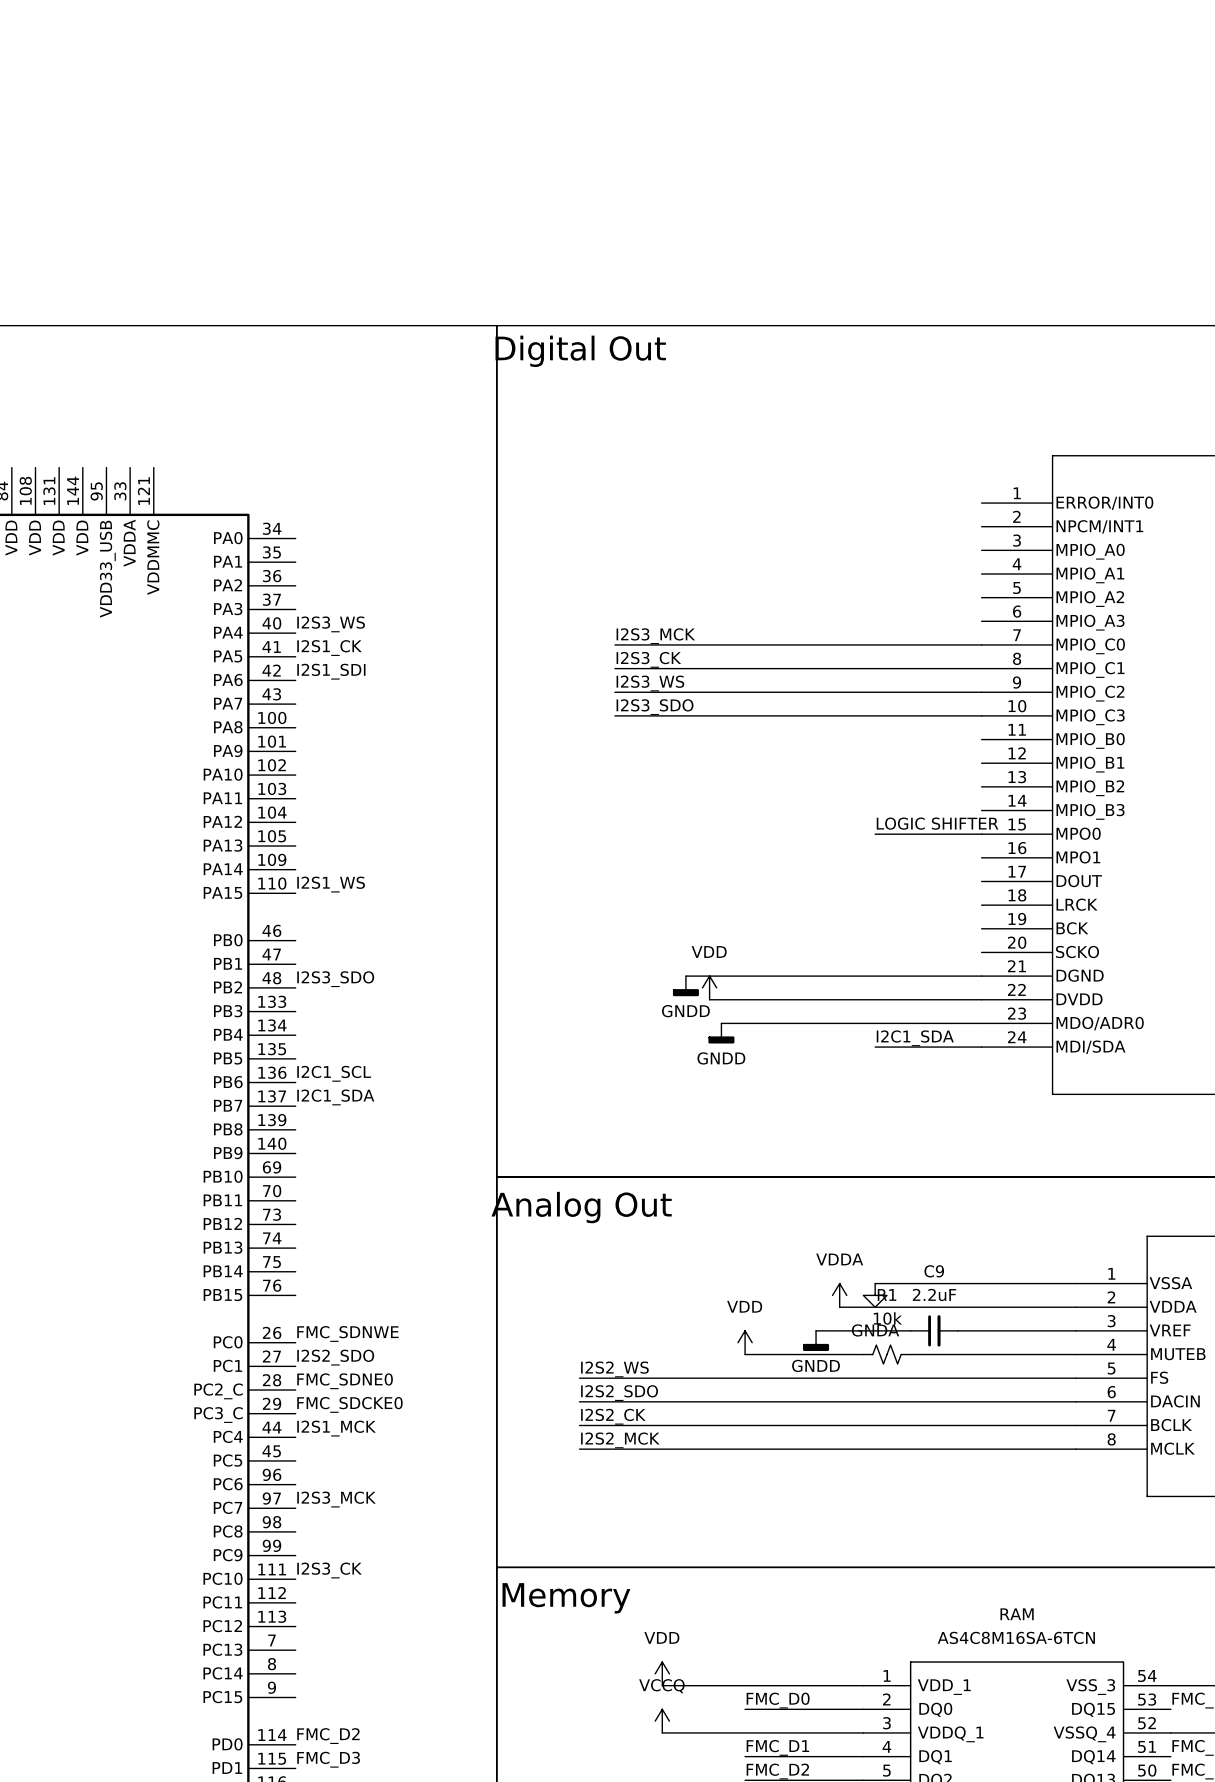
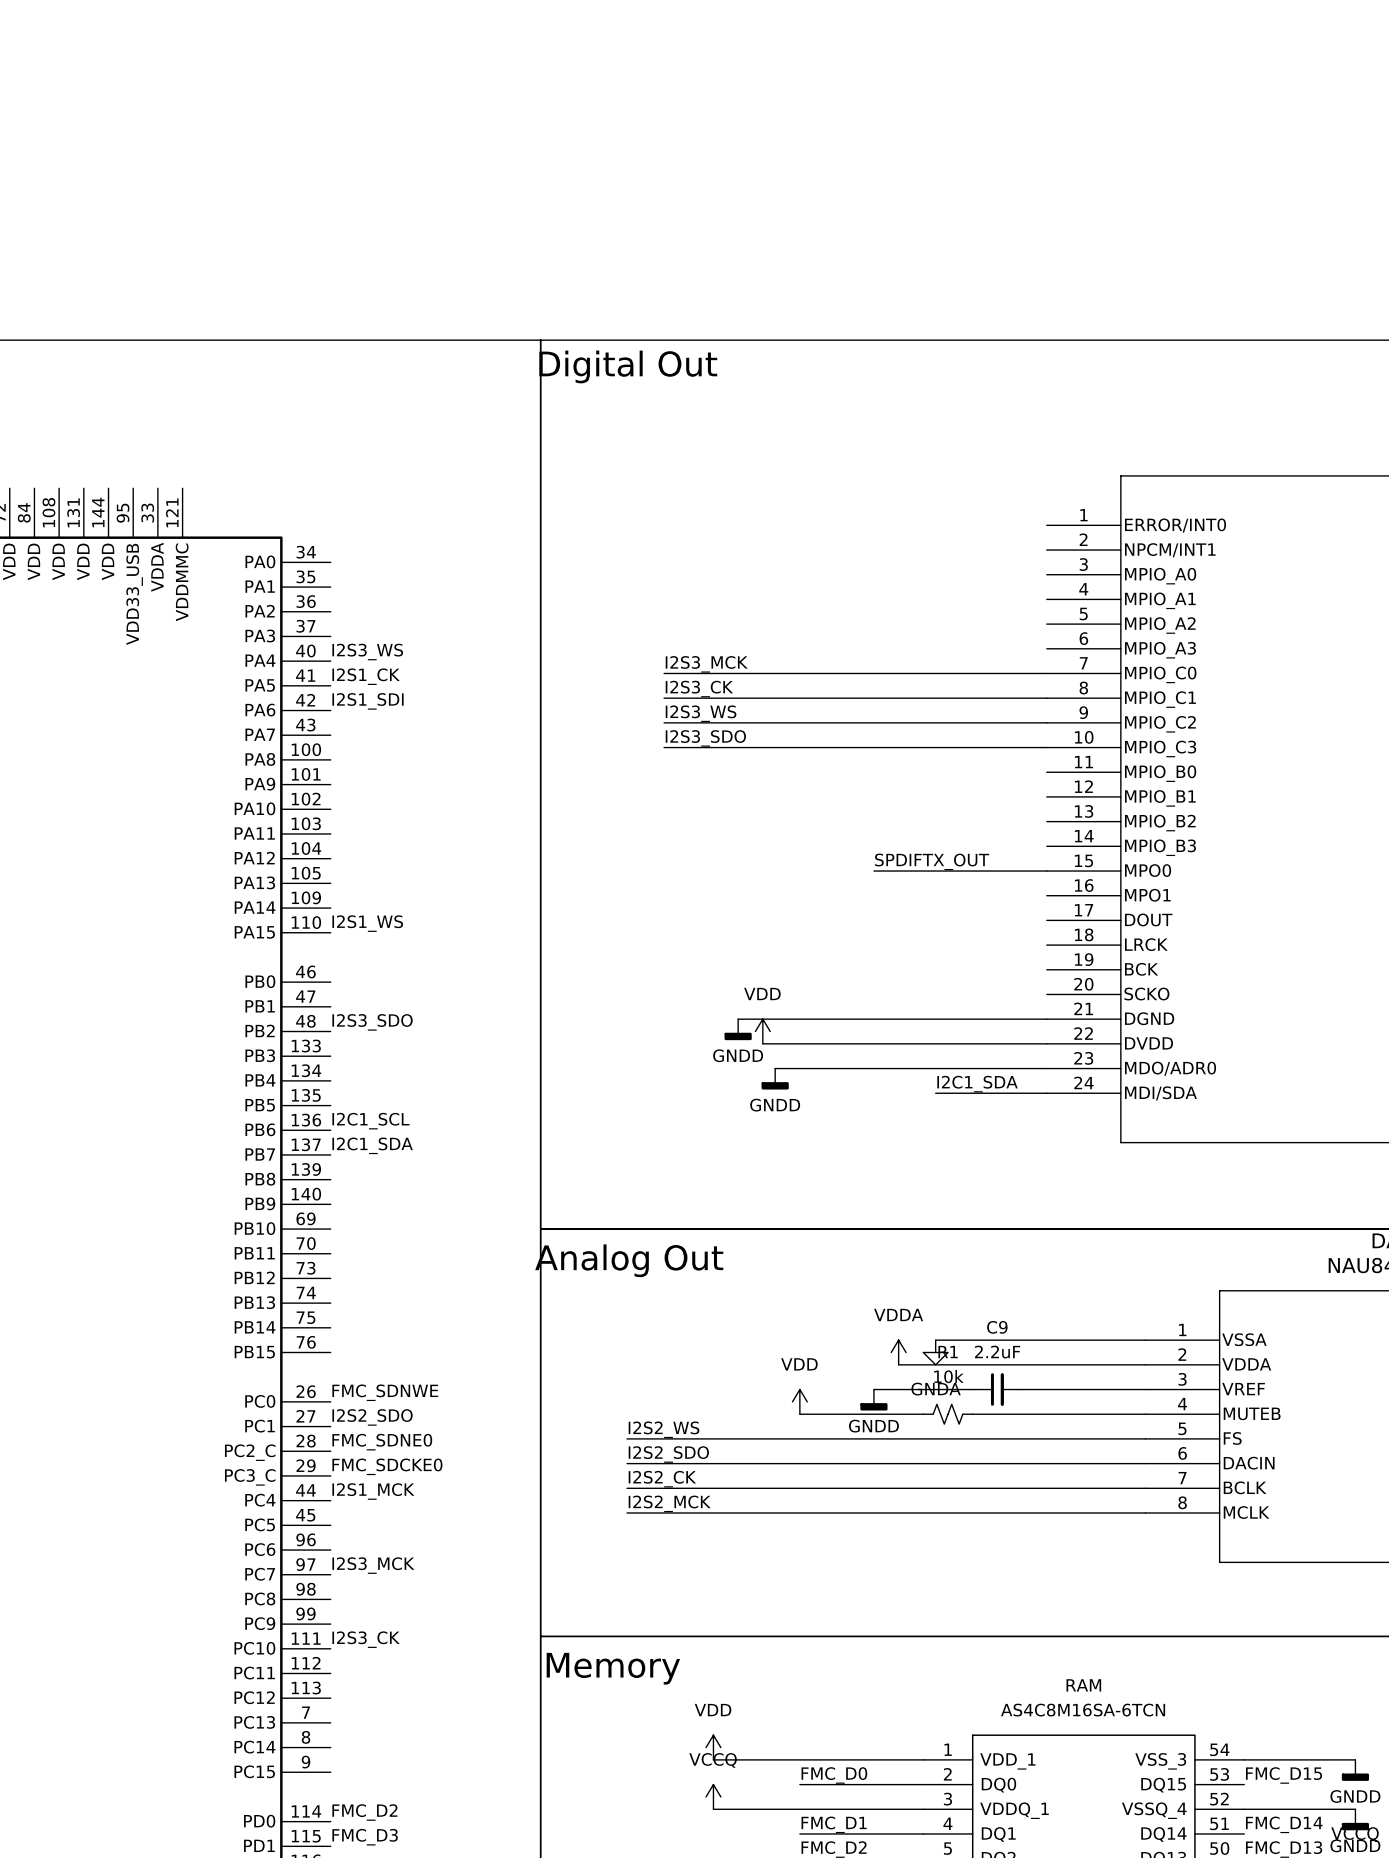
label: LOGIC SHIFTER (937, 823) -> none
label: none -> SPDIFTX_OUT (932, 861)
wire: none -> (873, 871) (935, 871)

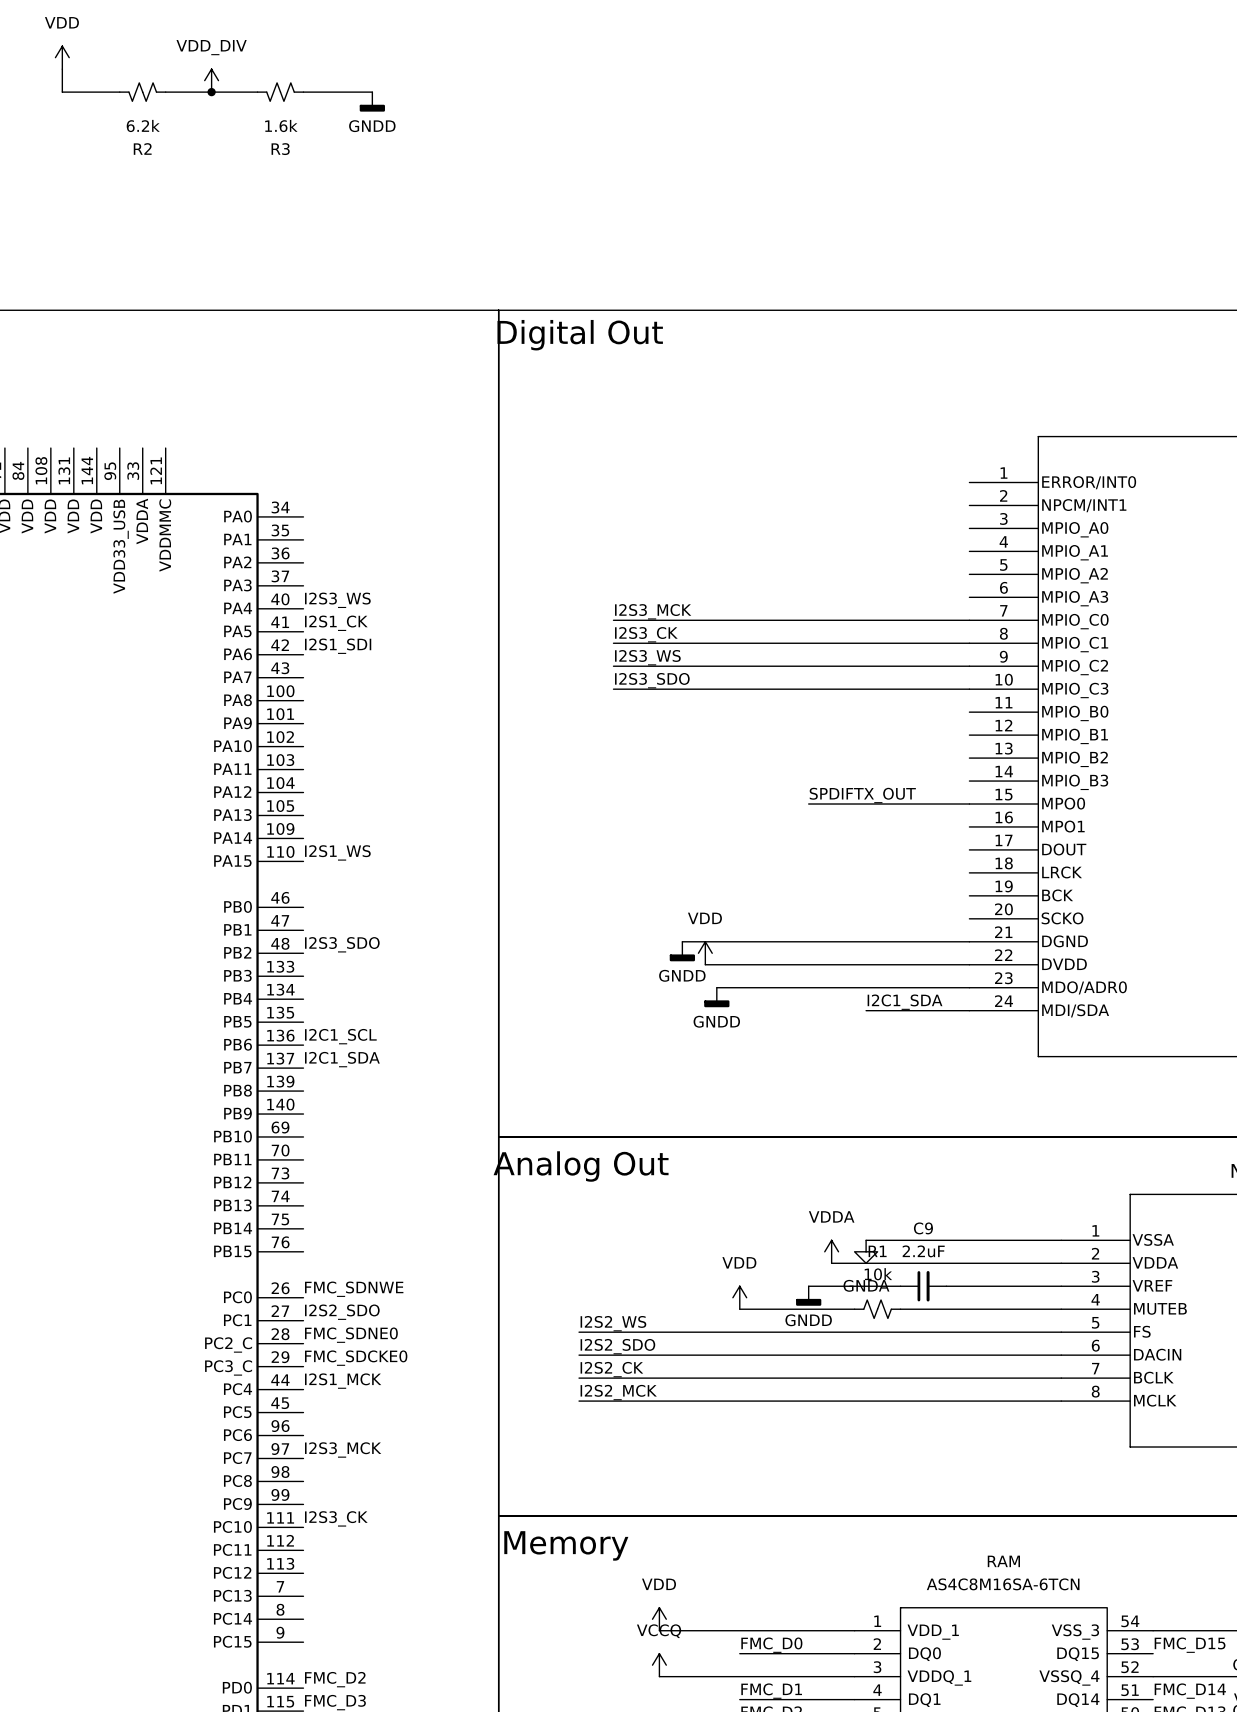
power symbol: none -> VDD (62, 57)
wire: none -> (62, 69) (62, 92) (119, 92)
power symbol: none -> VDD_DIV (211, 80)
R2: none -> 6.2k (142, 92)
wire: none -> (165, 92) (257, 92)
junction: none -> (211, 92)
R3: none -> 1.6k (280, 92)
wire: none -> (303, 92) (372, 92)
power symbol: none -> GNDD (372, 101)

